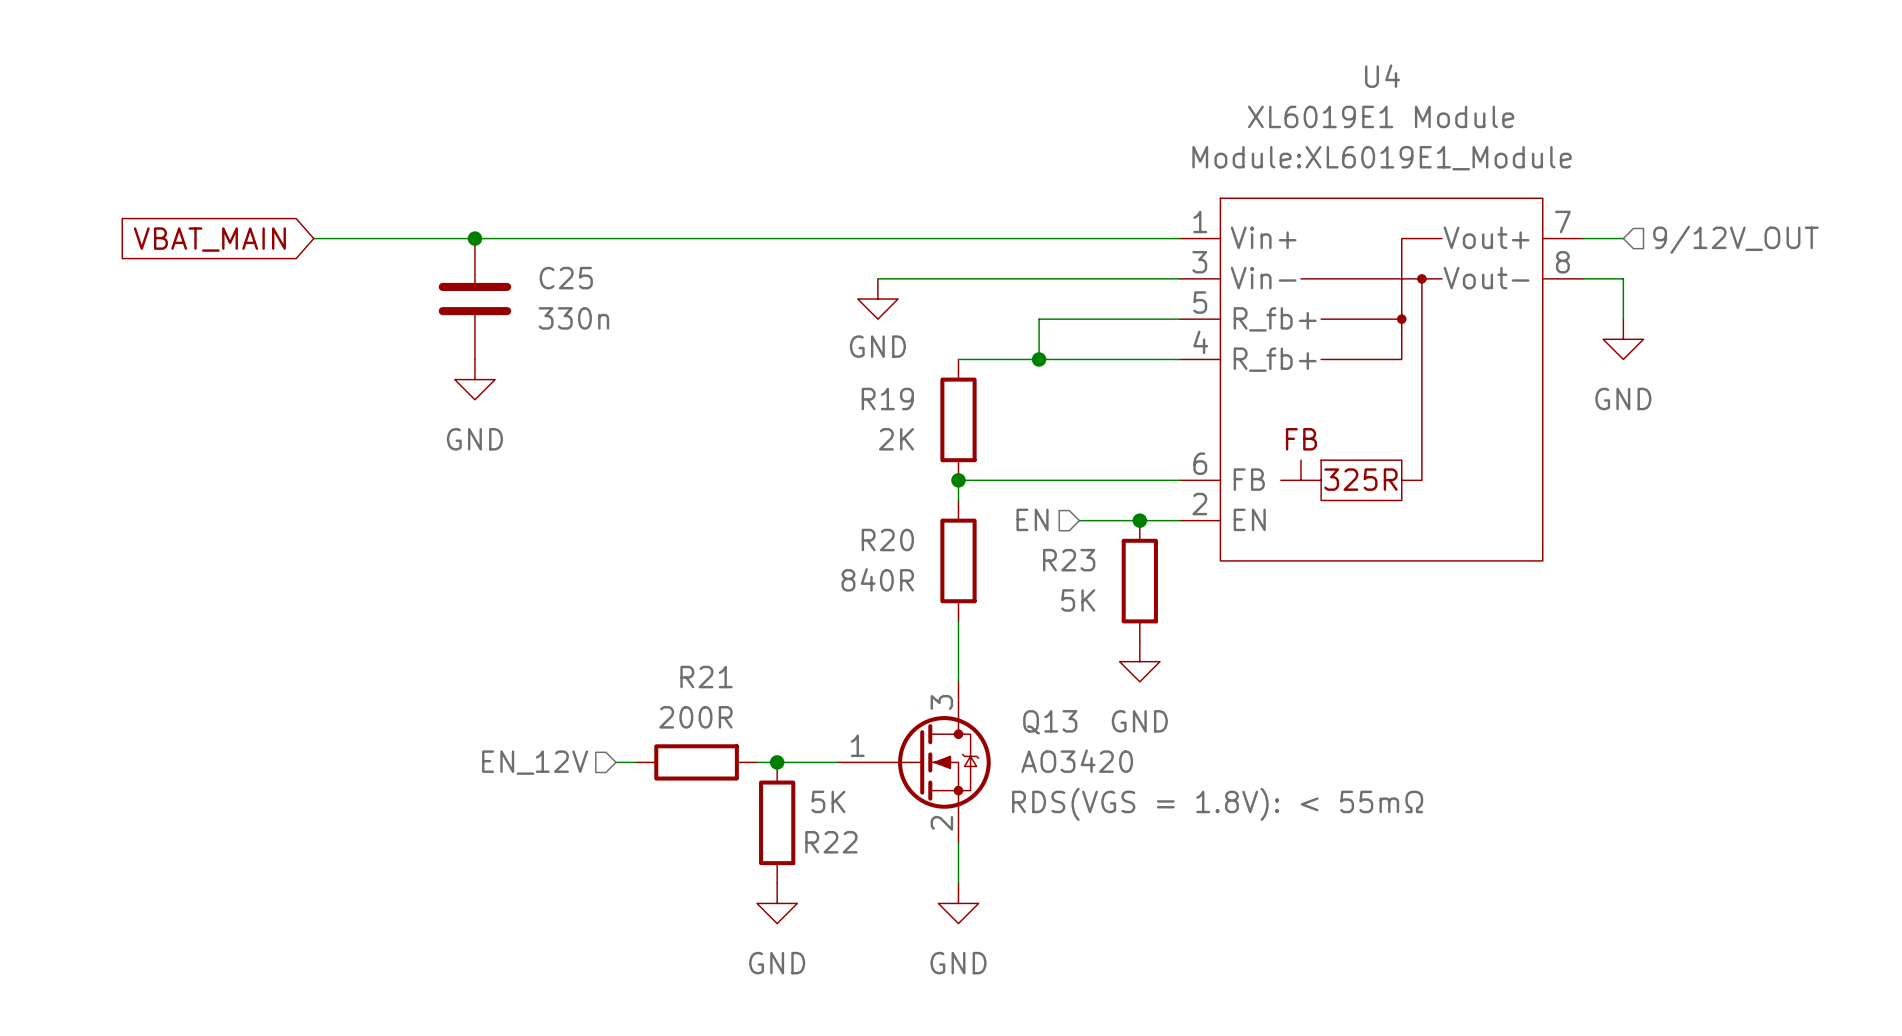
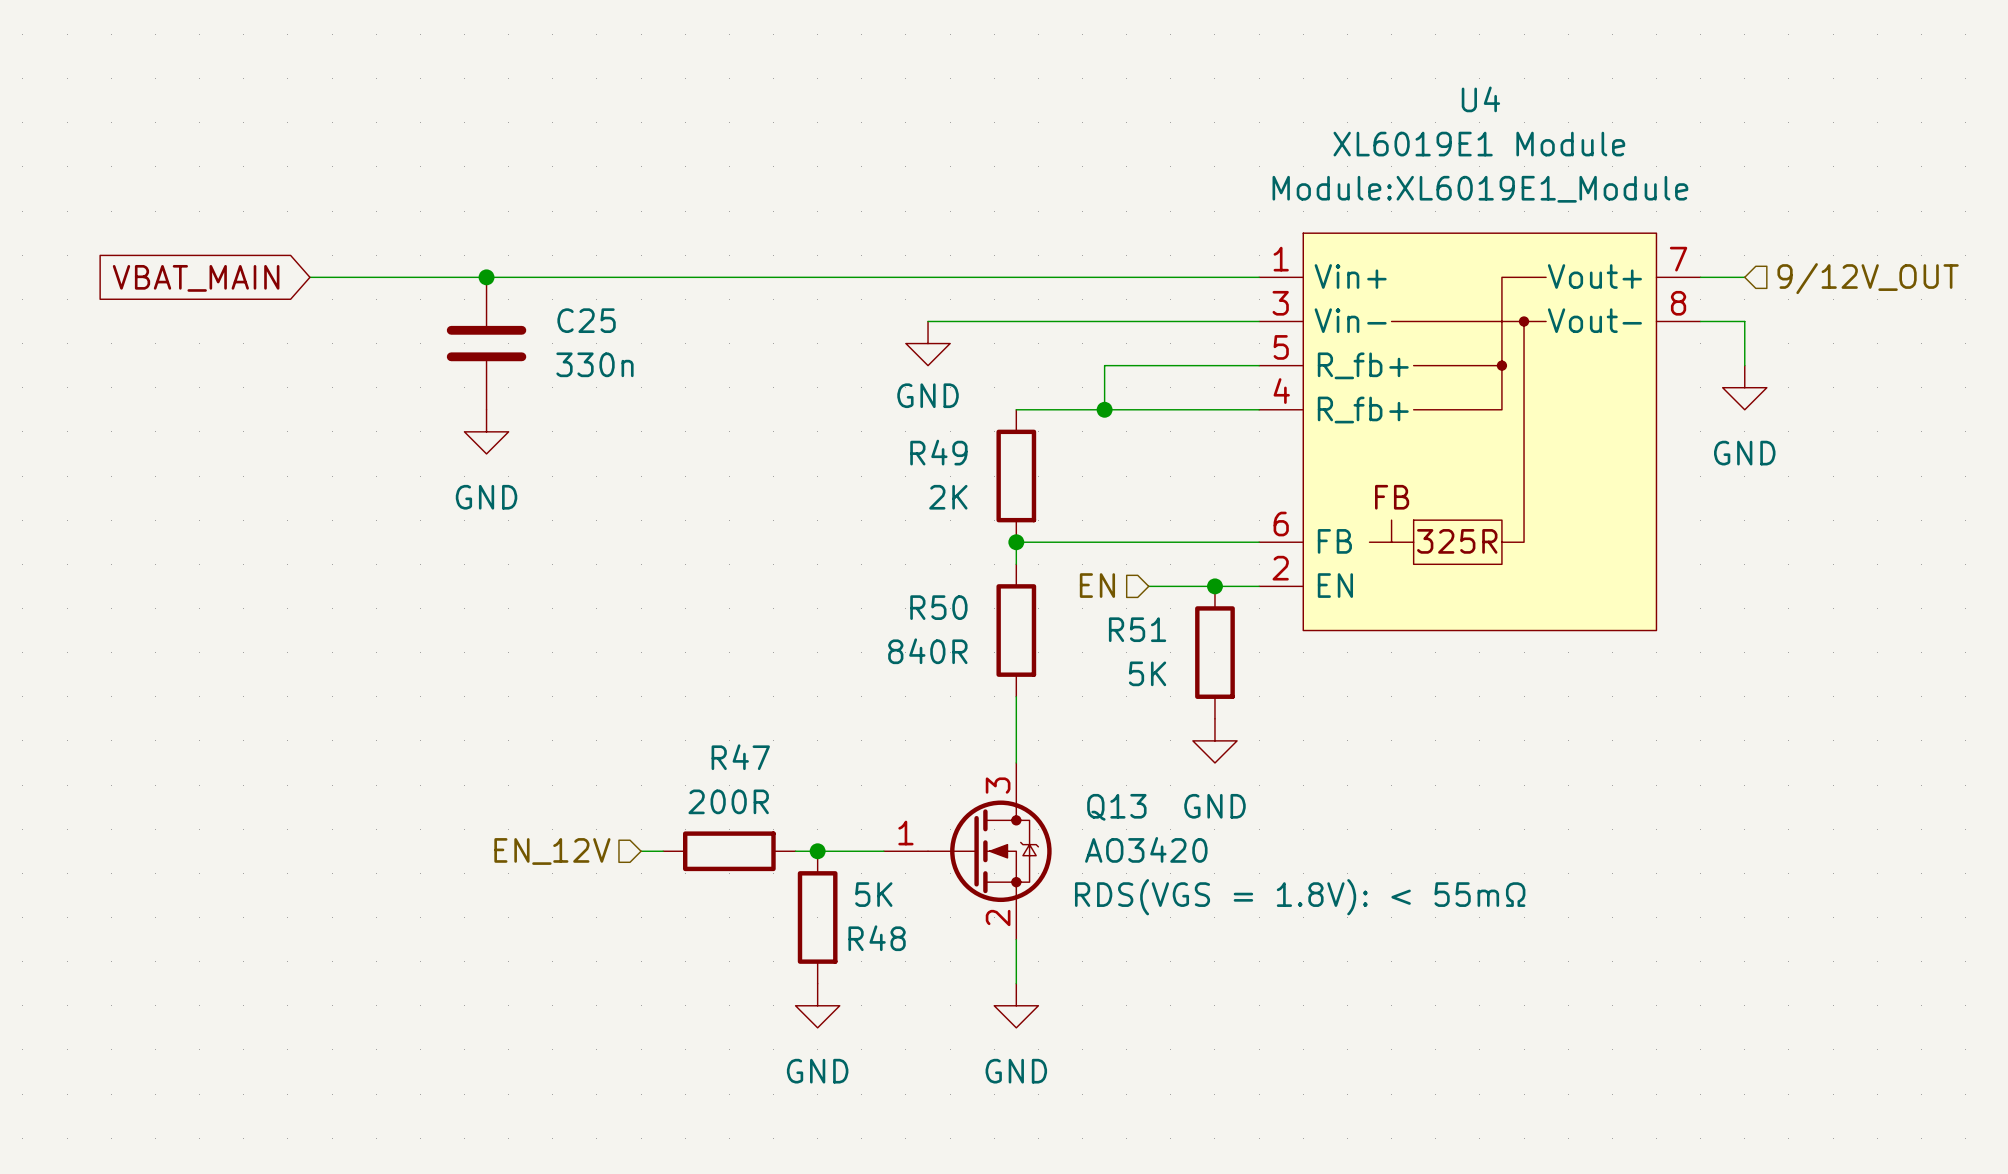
R19 name: R19 (887, 399) -> R49 (938, 452)
R20 name: R20 (887, 540) -> R50 (938, 607)
R23 name: R23 (1069, 560) -> R51 (1137, 629)
R21 name: R21 (706, 677) -> R47 (740, 757)
R22 name: R22 (831, 842) -> R48 (877, 938)

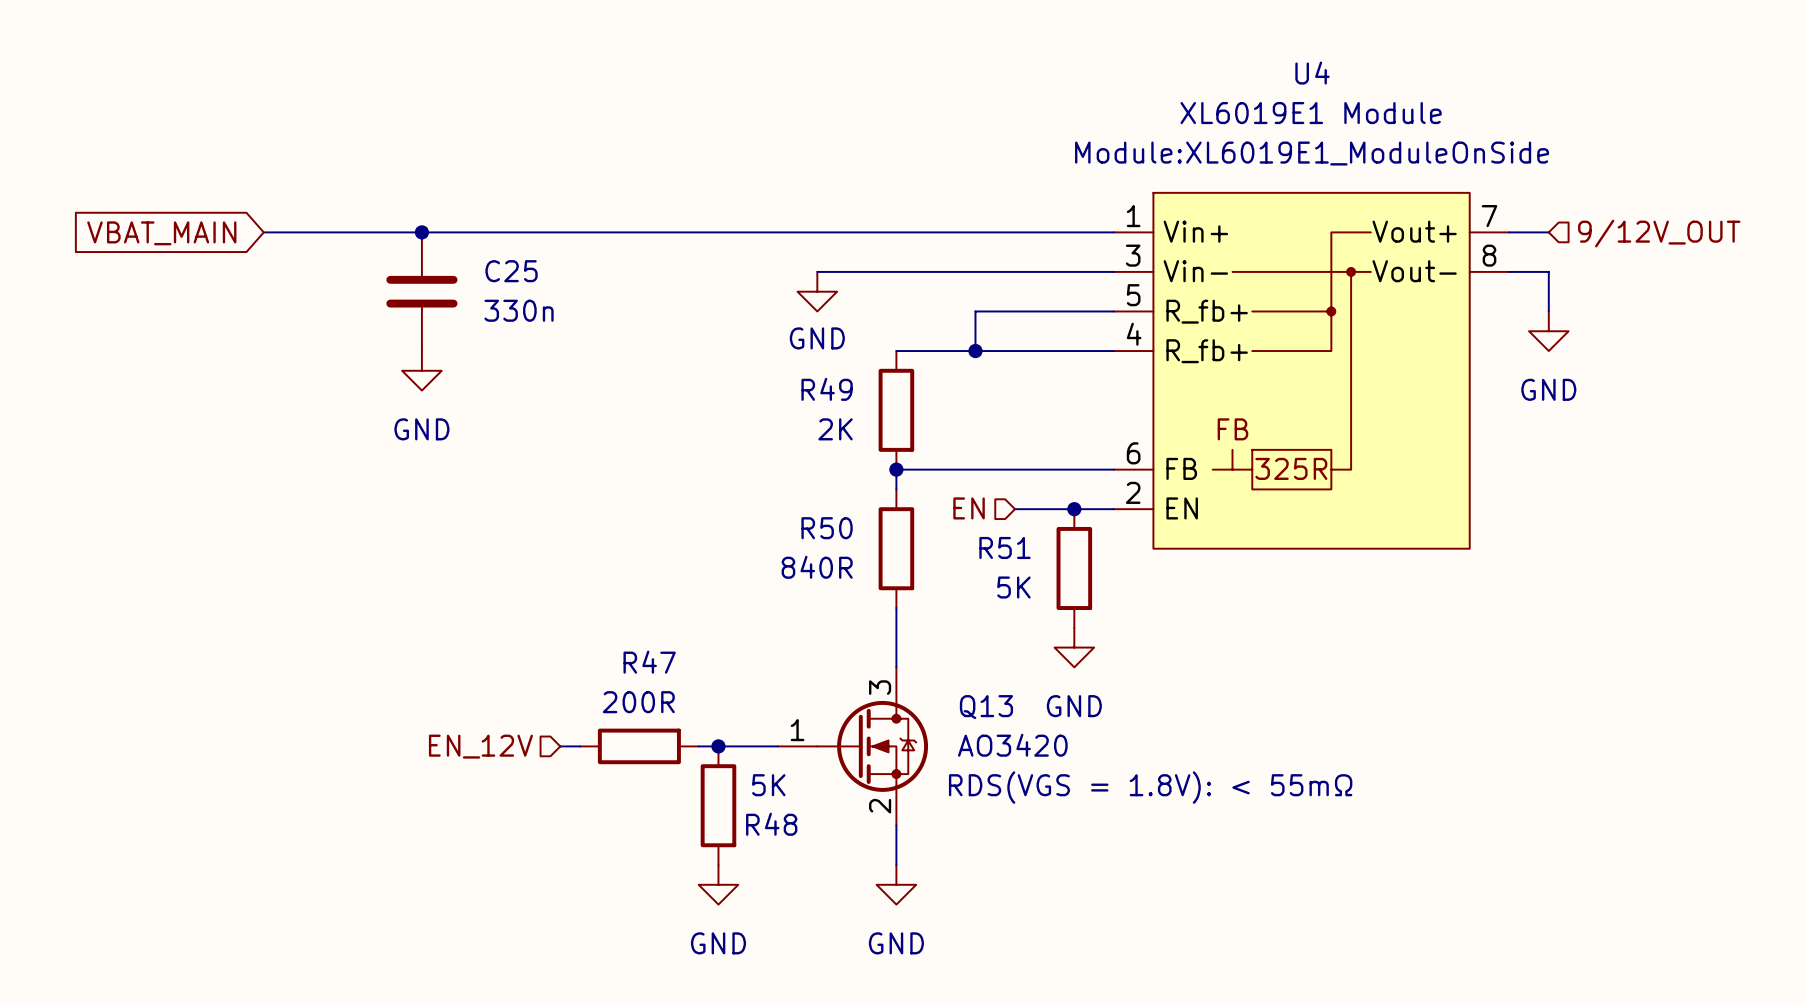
U4 text: Module:XL6019E1_Module (1480, 189) -> Module:XL6019E1_ModuleOnSide (1312, 153)

